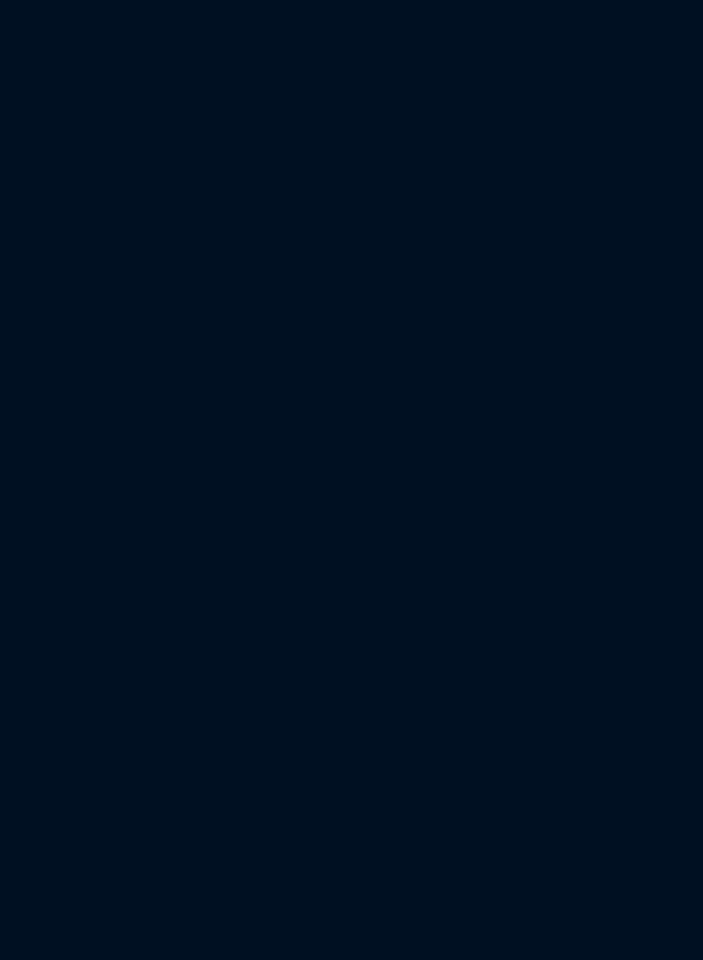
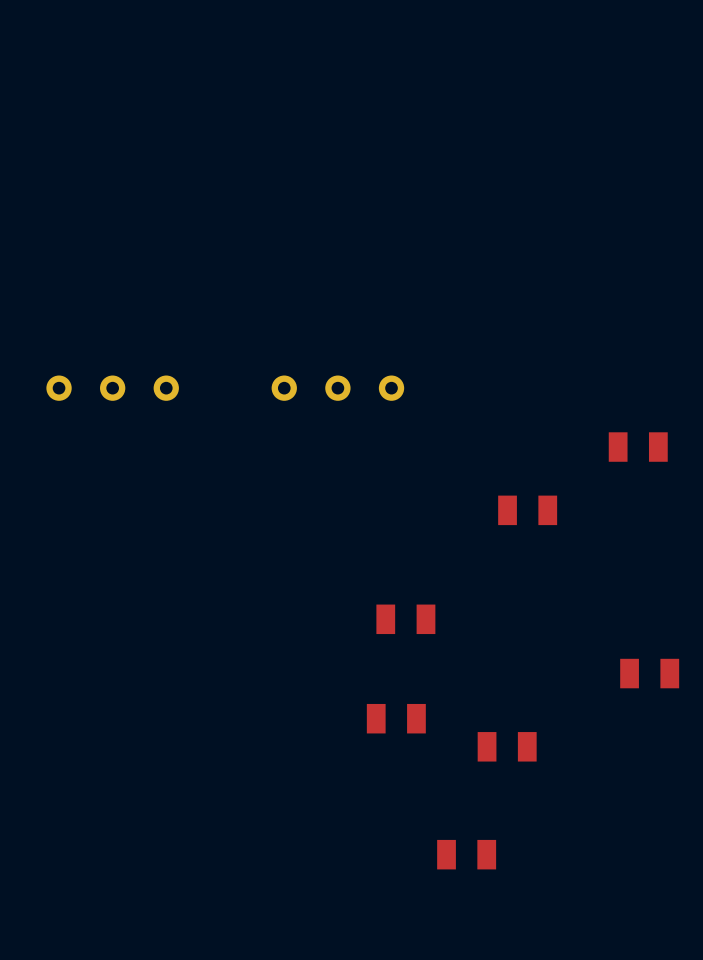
part: none -> (112, 388)
part: none -> (337, 388)
part: none -> (638, 447)
part: none -> (527, 510)
part: none -> (405, 619)
part: none -> (649, 673)
part: none -> (396, 718)
part: none -> (507, 746)
part: none -> (466, 854)

